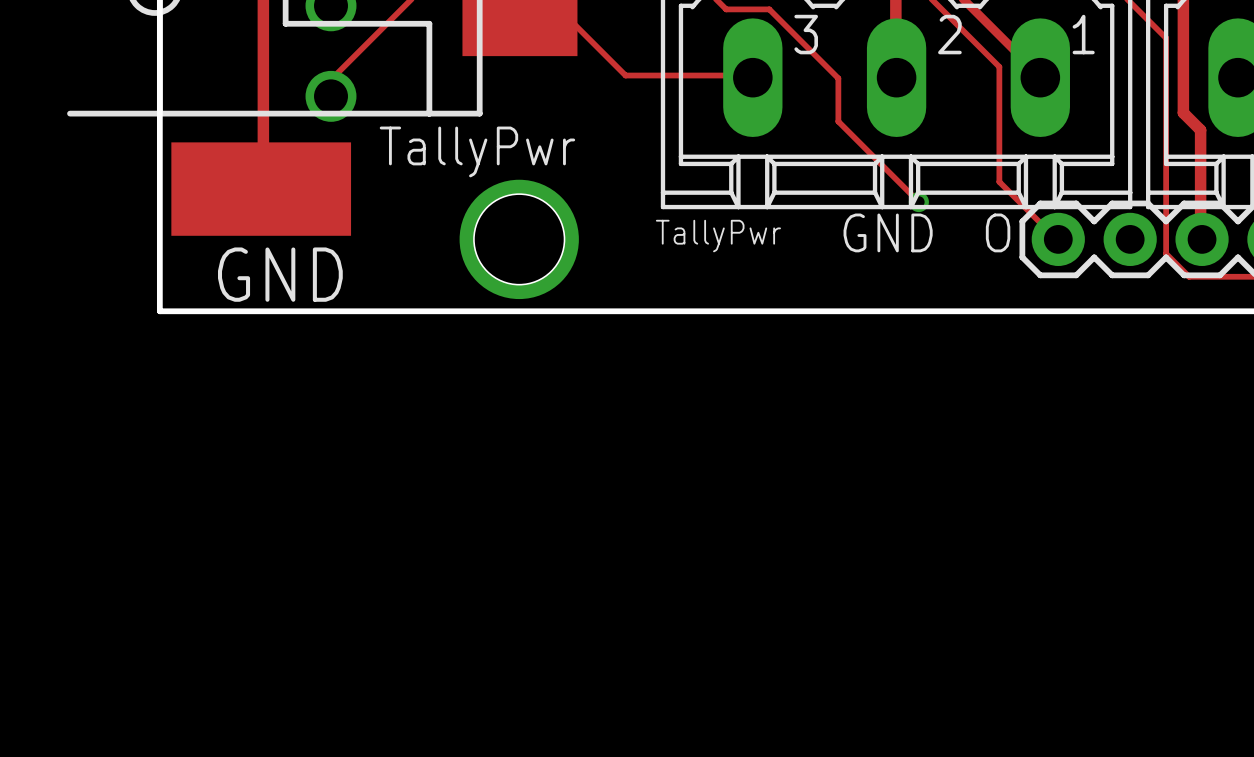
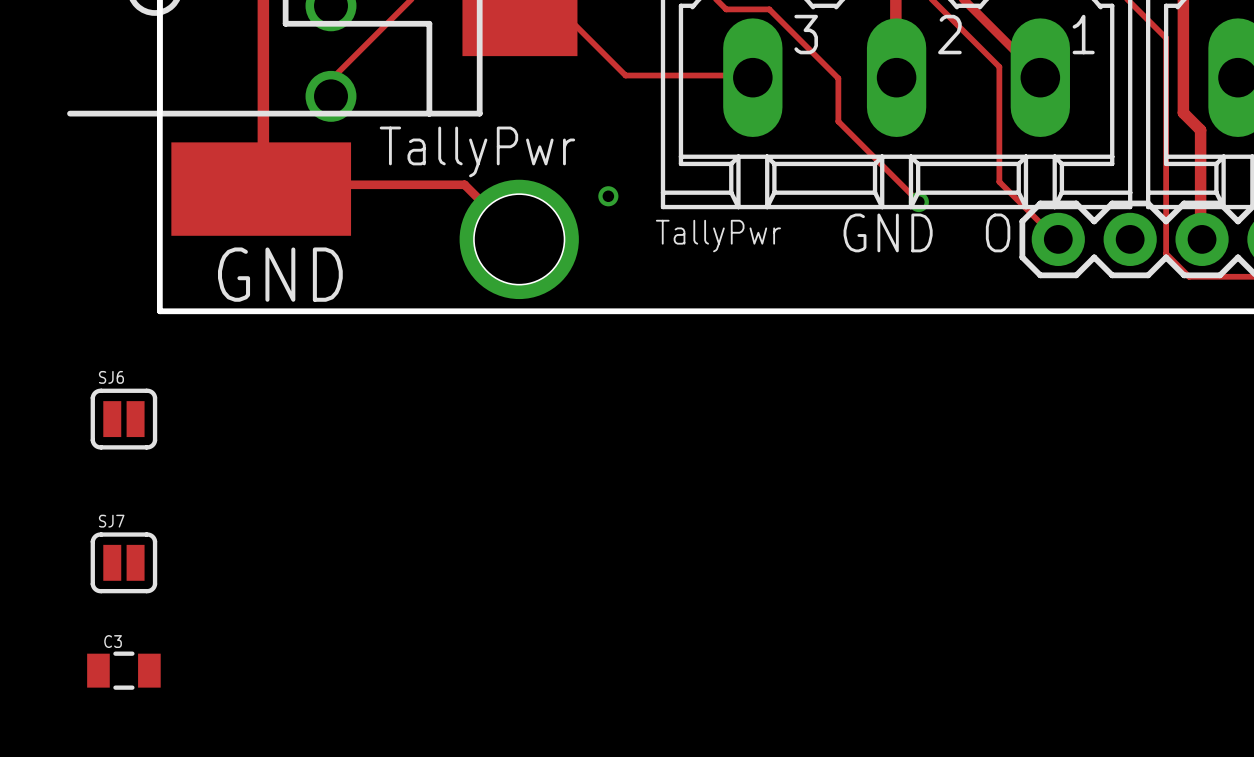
track: none -> (279, 189) (280, 184) (464, 184) (519, 239)
via: none -> (608, 196)
SJ6: none -> (123, 419)
SJ7: none -> (123, 562)
C3: none -> (123, 670)

